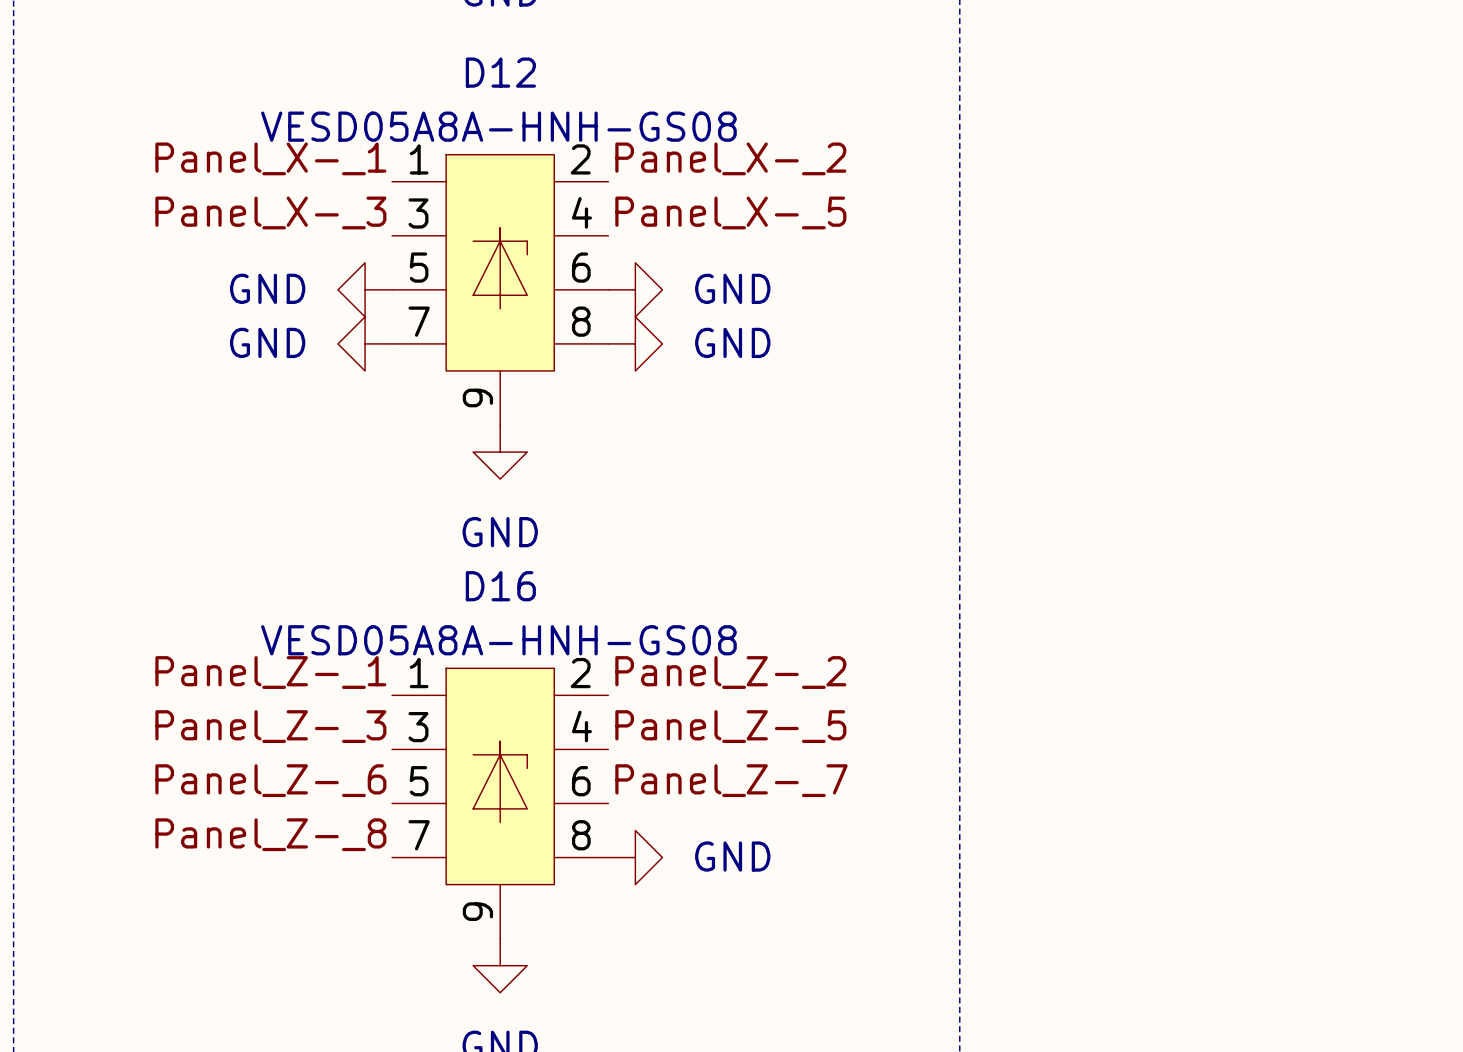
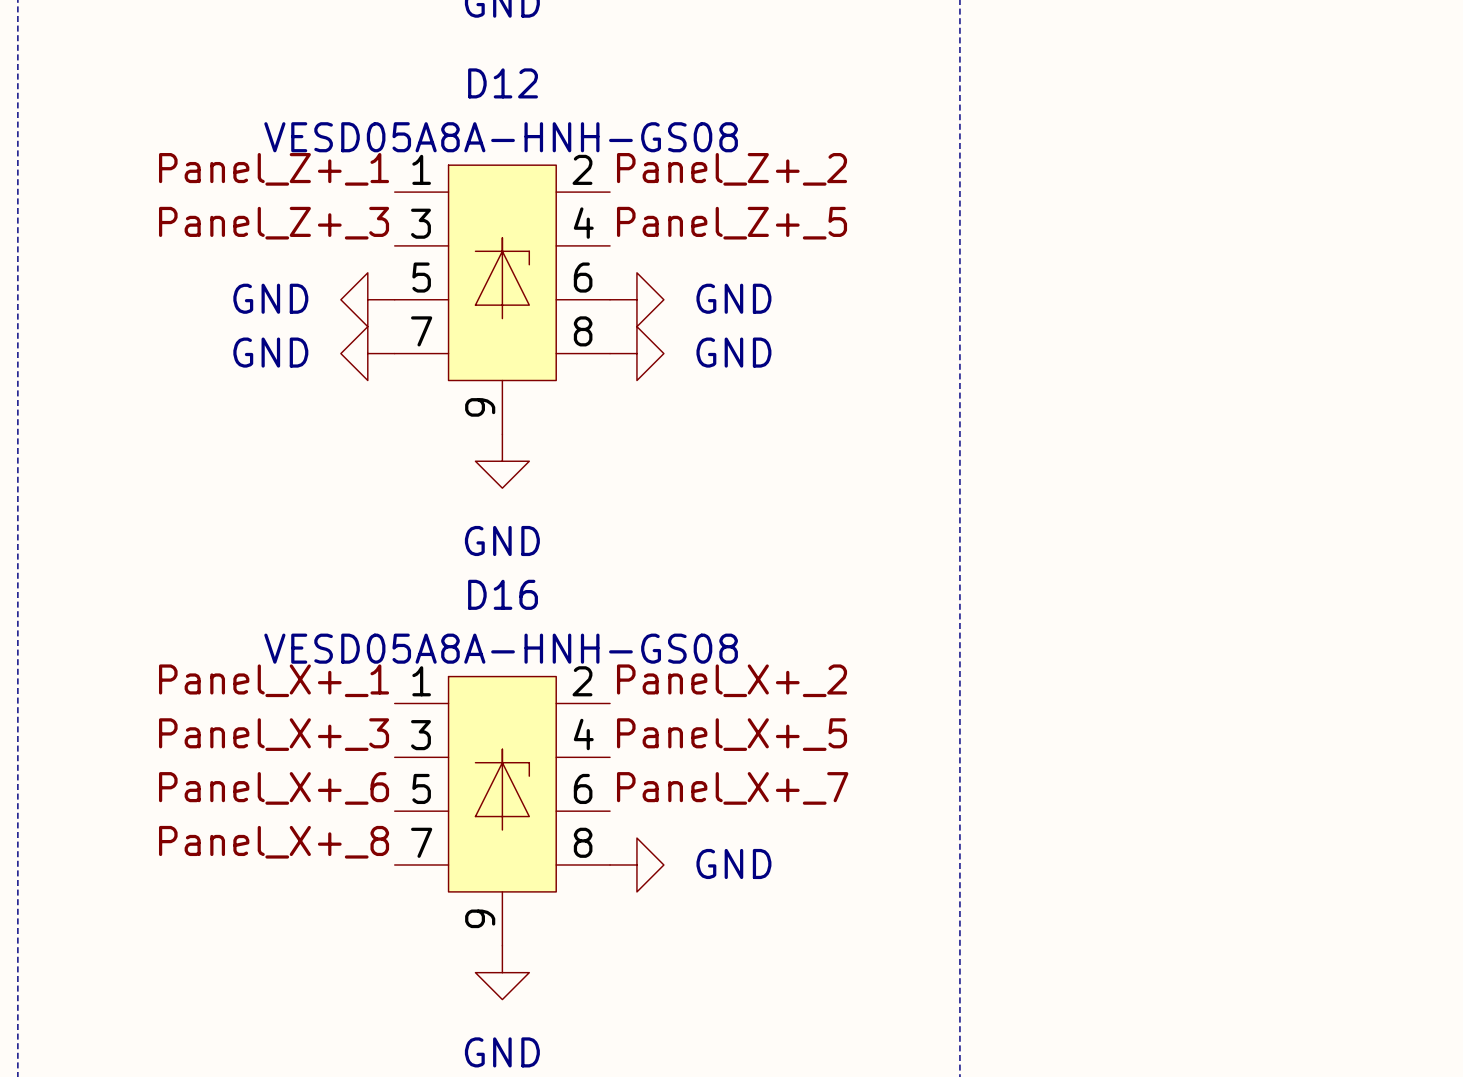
label: Panel_X-_1 (270, 158) -> Panel_Z+_1 (274, 169)
label: Panel_X-_2 (730, 158) -> Panel_Z+_2 (732, 169)
label: Panel_X-_3 (270, 212) -> Panel_Z+_3 (274, 223)
label: Panel_X-_5 (730, 212) -> Panel_Z+_5 (732, 223)
label: Panel_Z-_1 (270, 672) -> Panel_X+_1 (274, 680)
label: Panel_Z-_2 (730, 672) -> Panel_X+_2 (732, 680)
label: Panel_Z-_3 (270, 726) -> Panel_X+_3 (274, 734)
label: Panel_Z-_5 (730, 726) -> Panel_X+_5 (732, 734)
label: Panel_Z-_6 (270, 780) -> Panel_X+_6 (274, 788)
label: Panel_Z-_7 (731, 780) -> Panel_X+_7 (732, 788)
label: Panel_Z-_8 (270, 834) -> Panel_X+_8 (274, 842)

